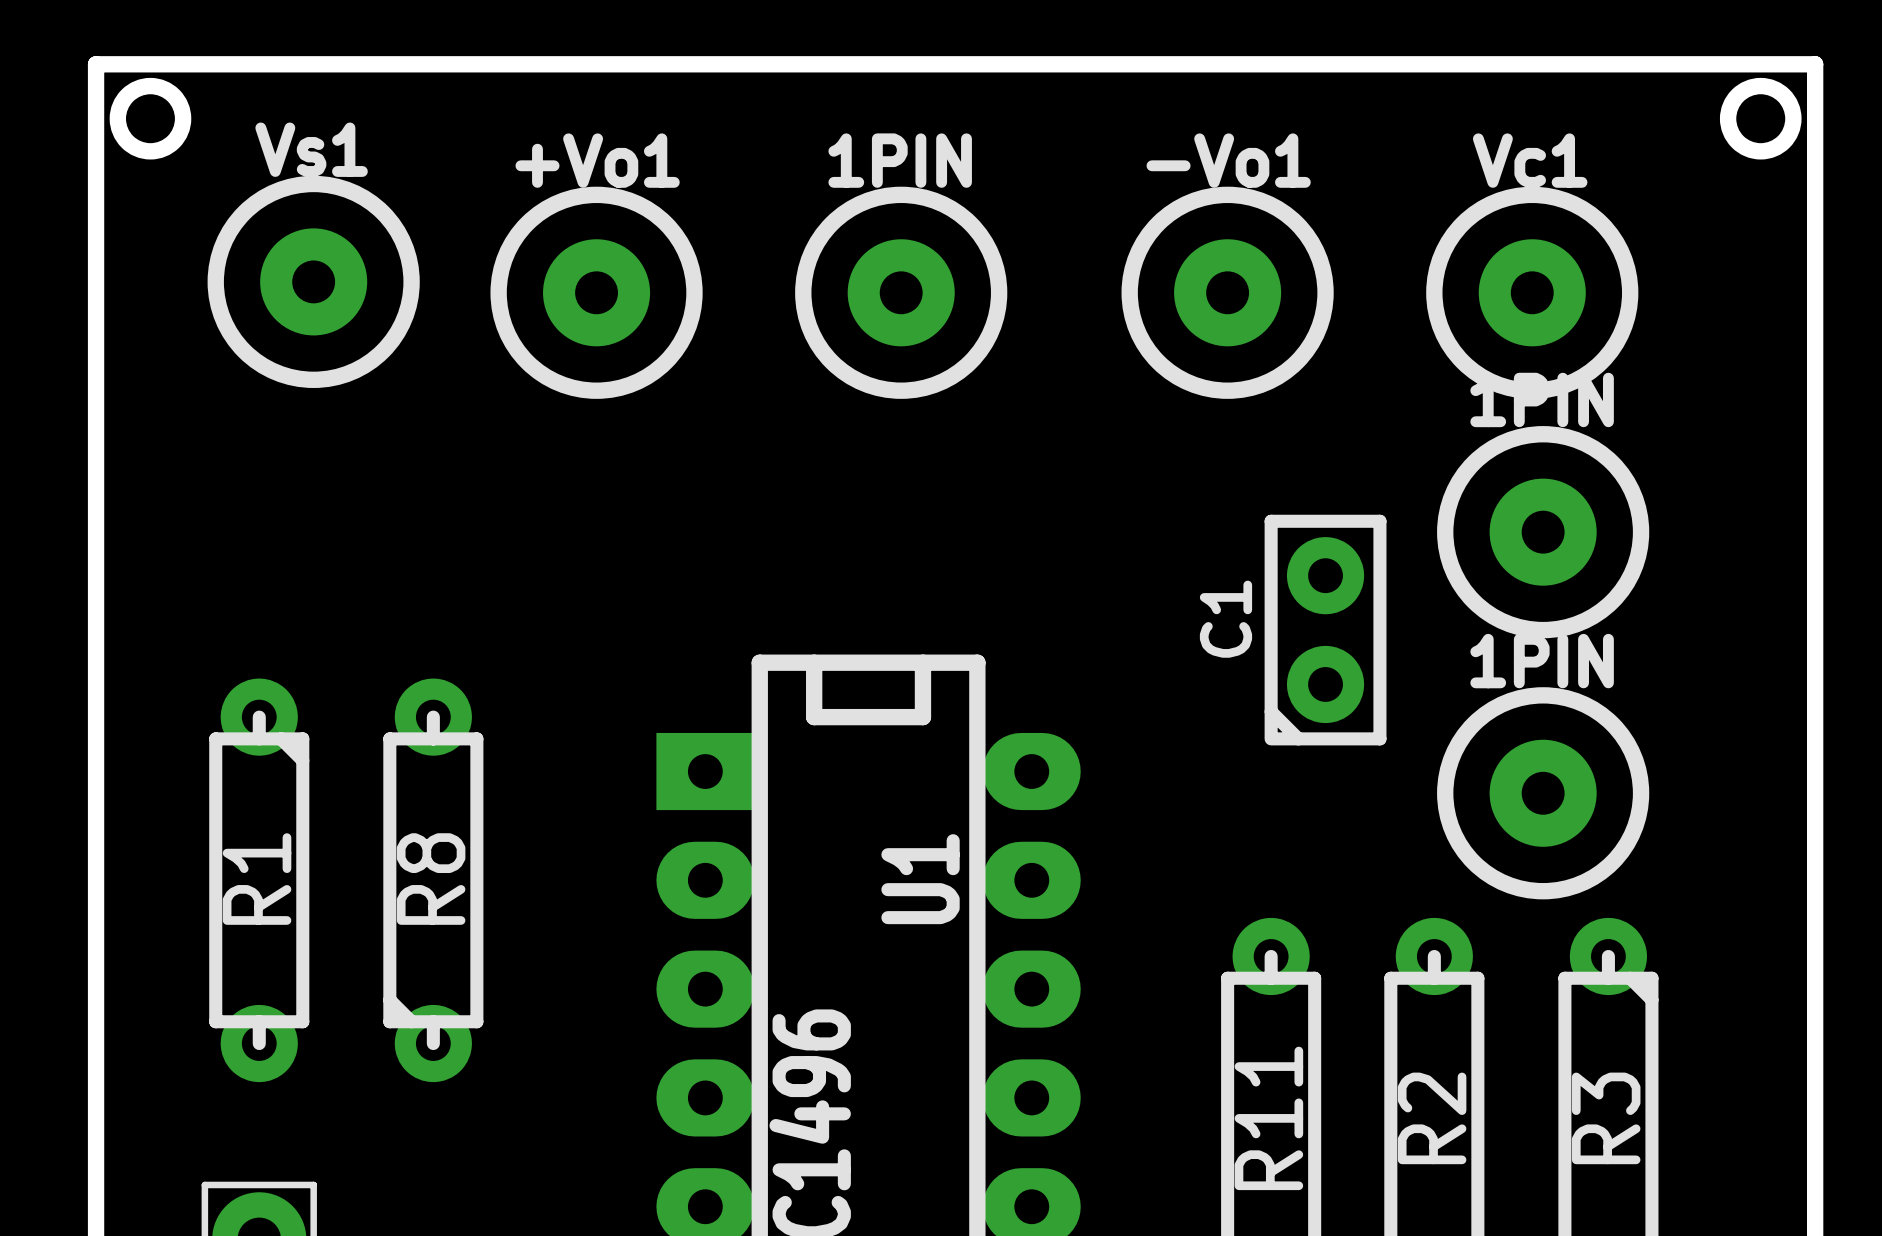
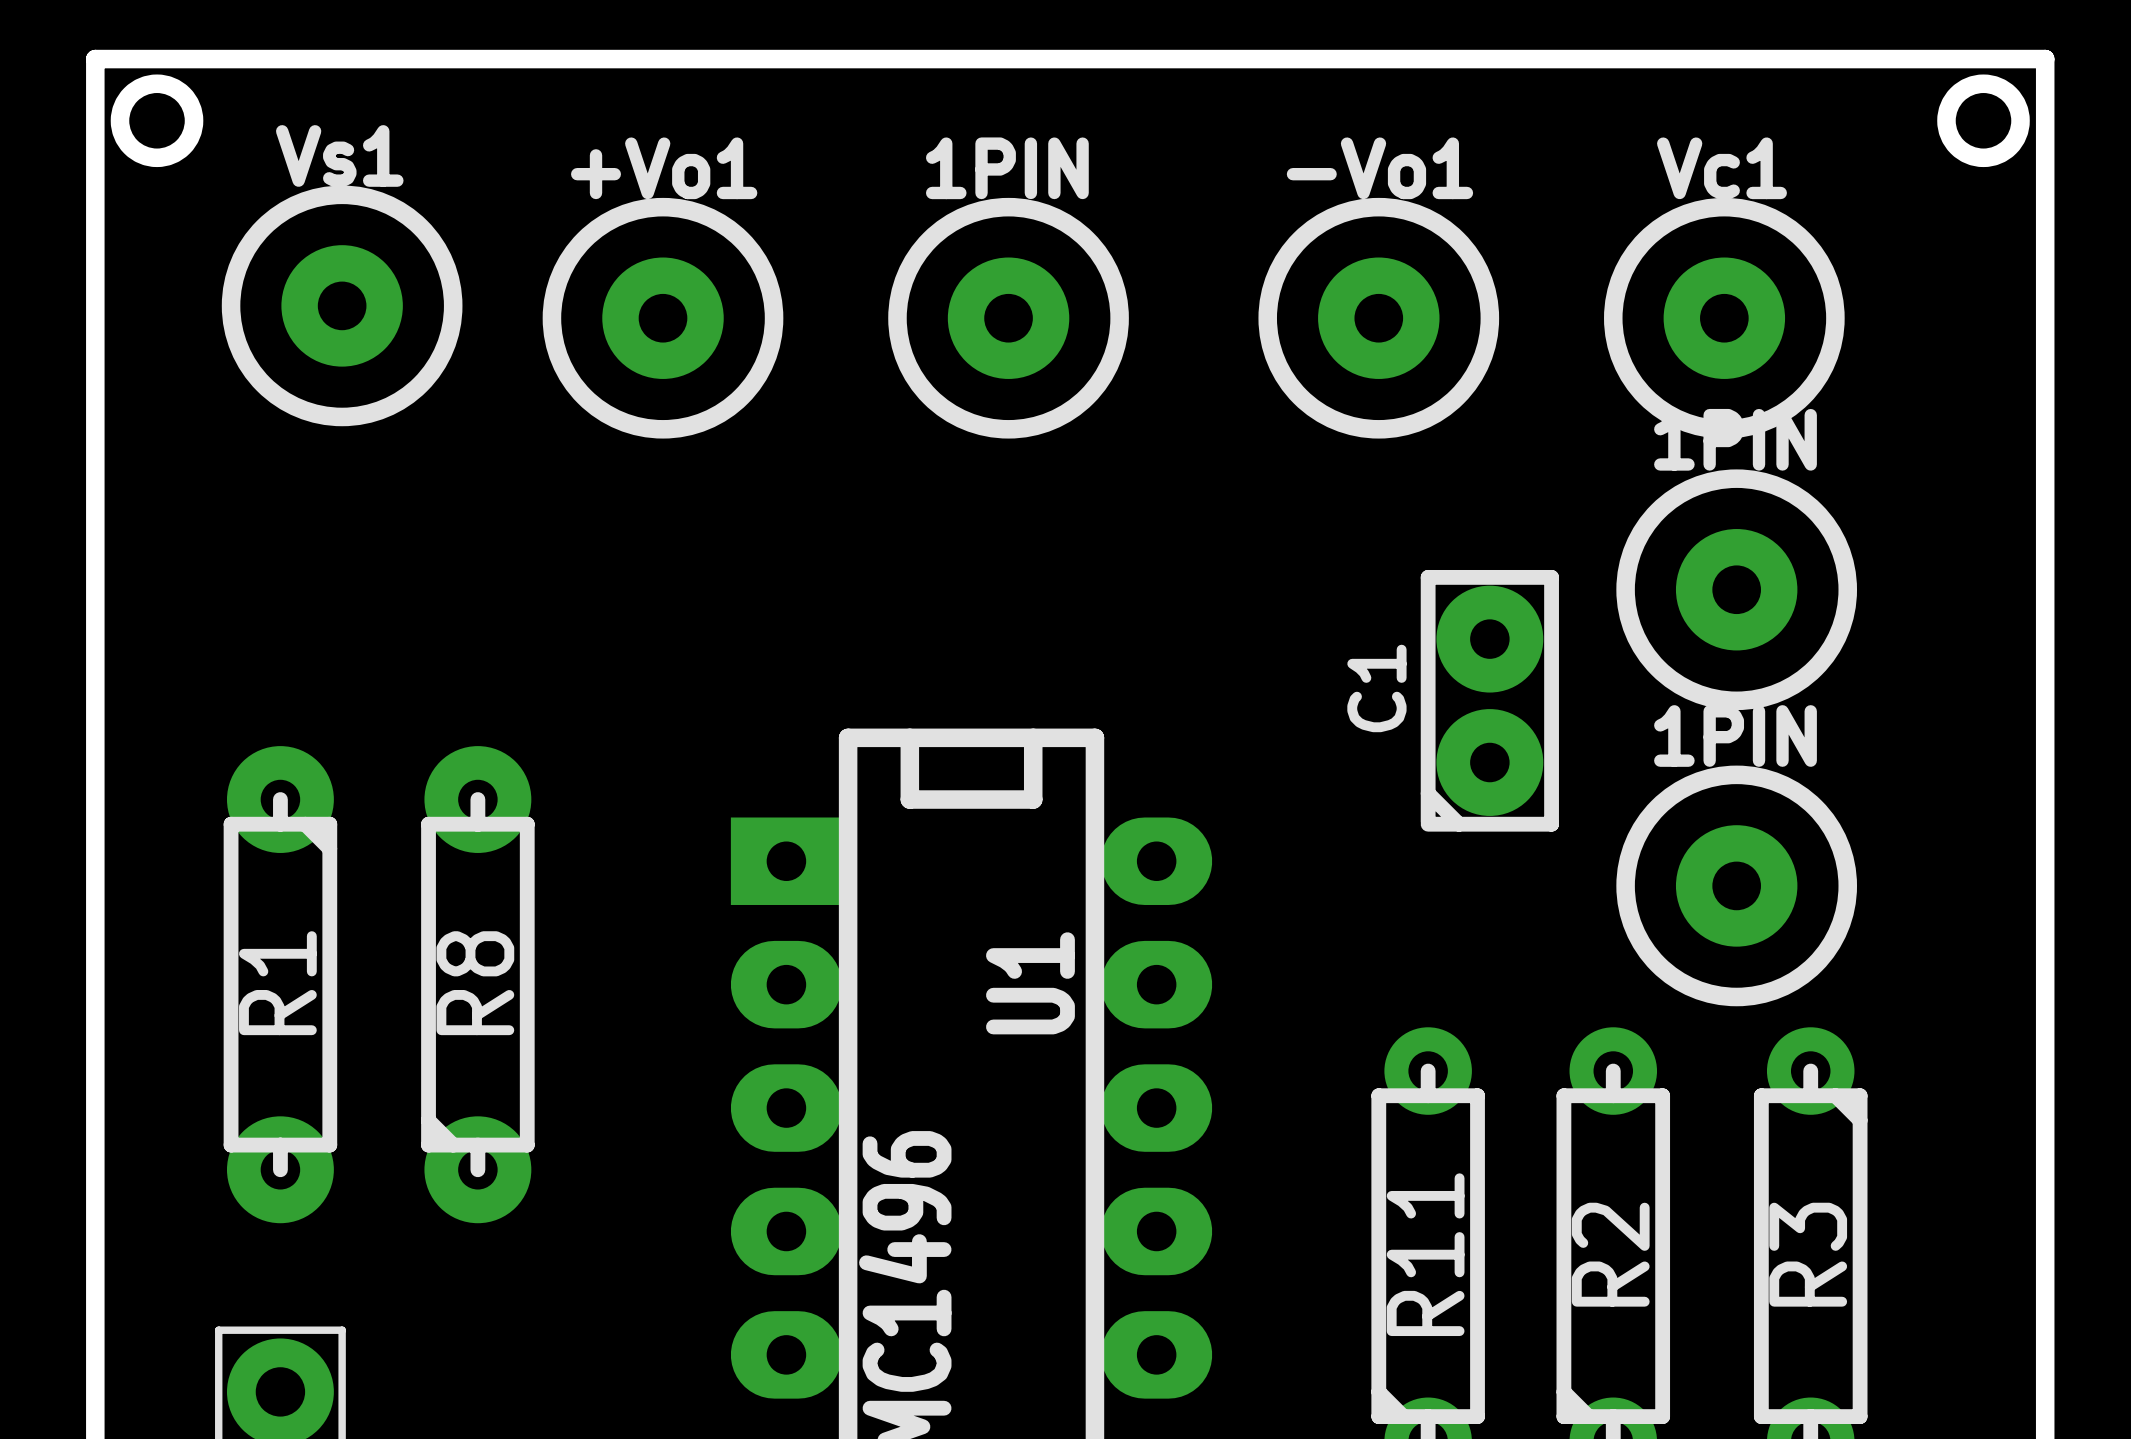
C1 footprint: [1264, 514, 1387, 746] -> [1420, 569, 1559, 832]
R1 footprint: [209, 678, 310, 1083] -> [223, 746, 338, 1224]
R8 footprint: [383, 678, 484, 1083] -> [421, 746, 535, 1224]

